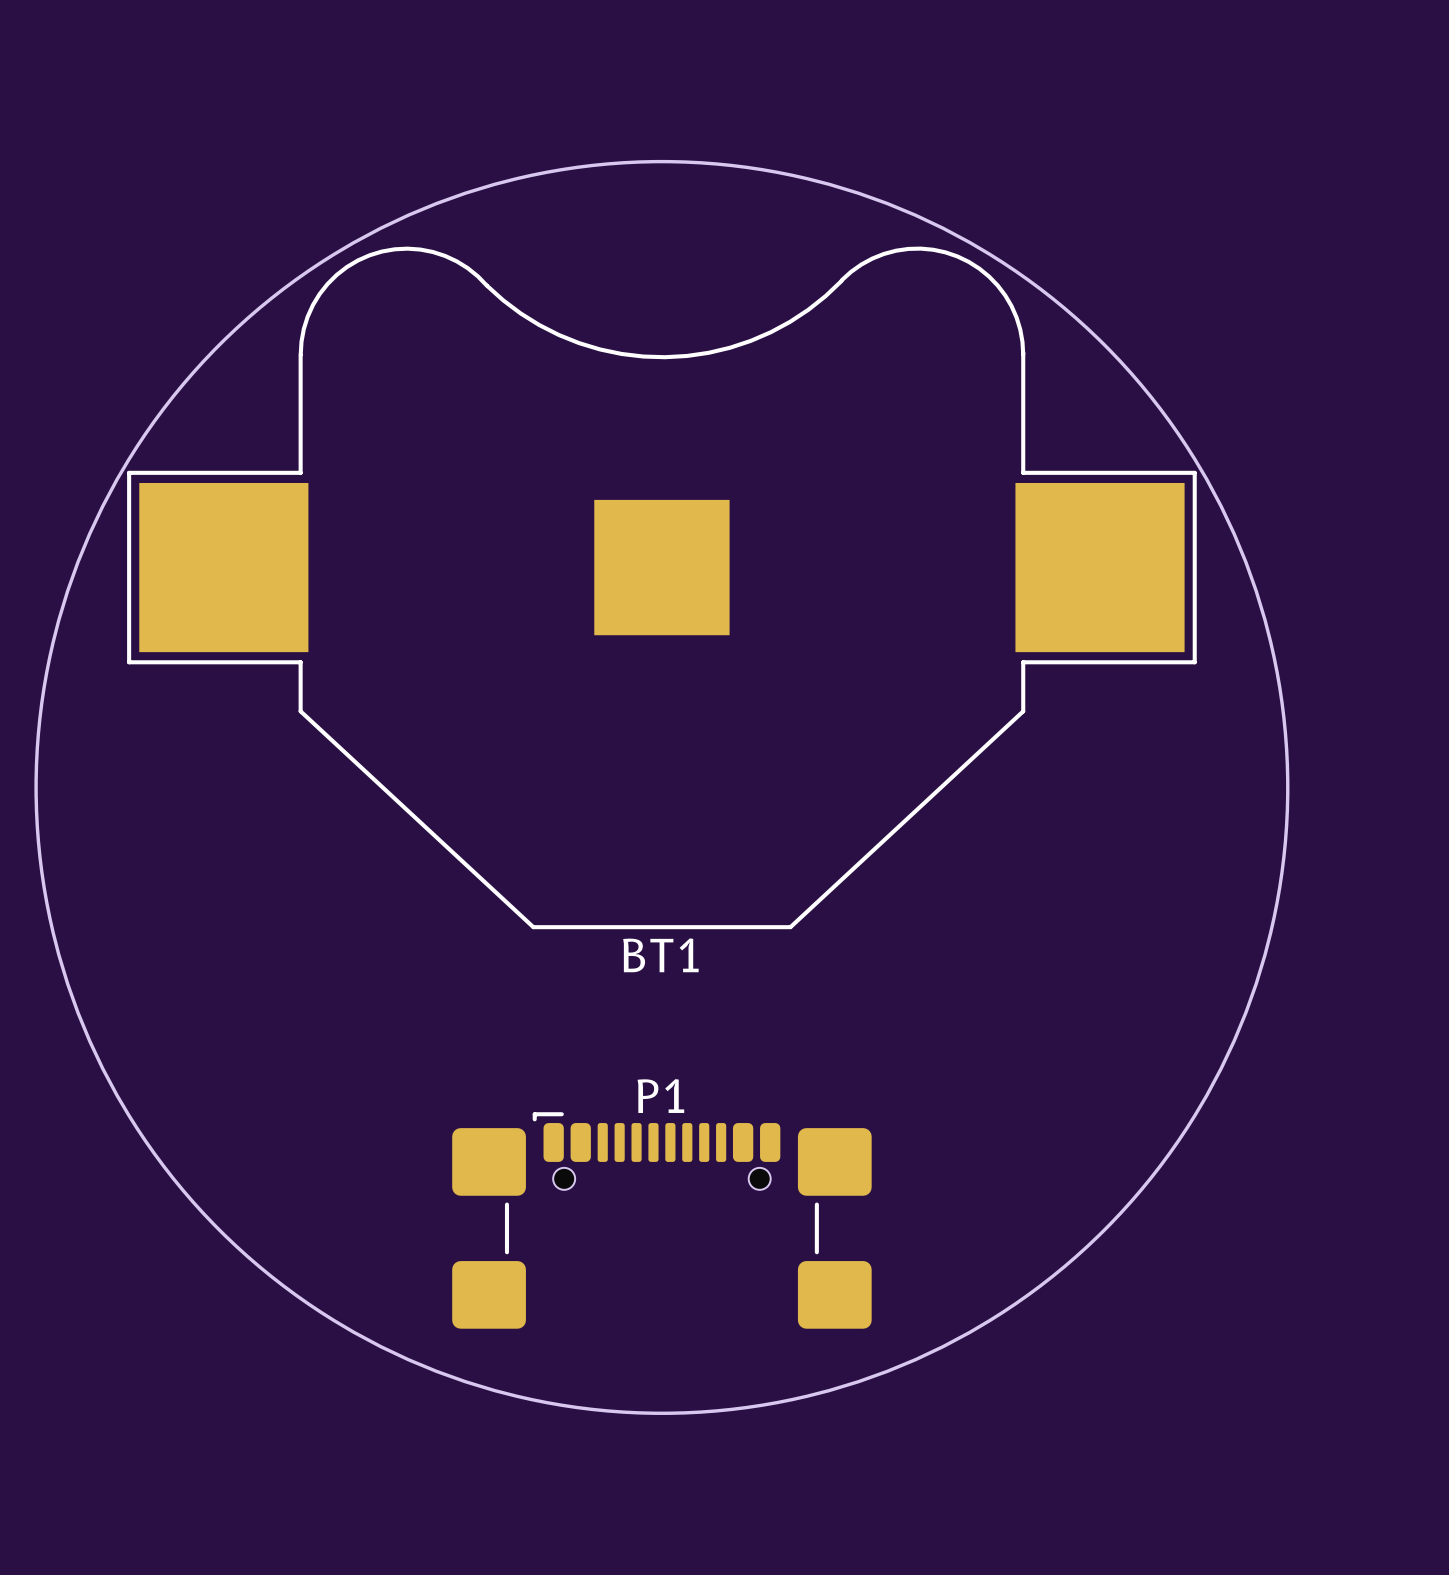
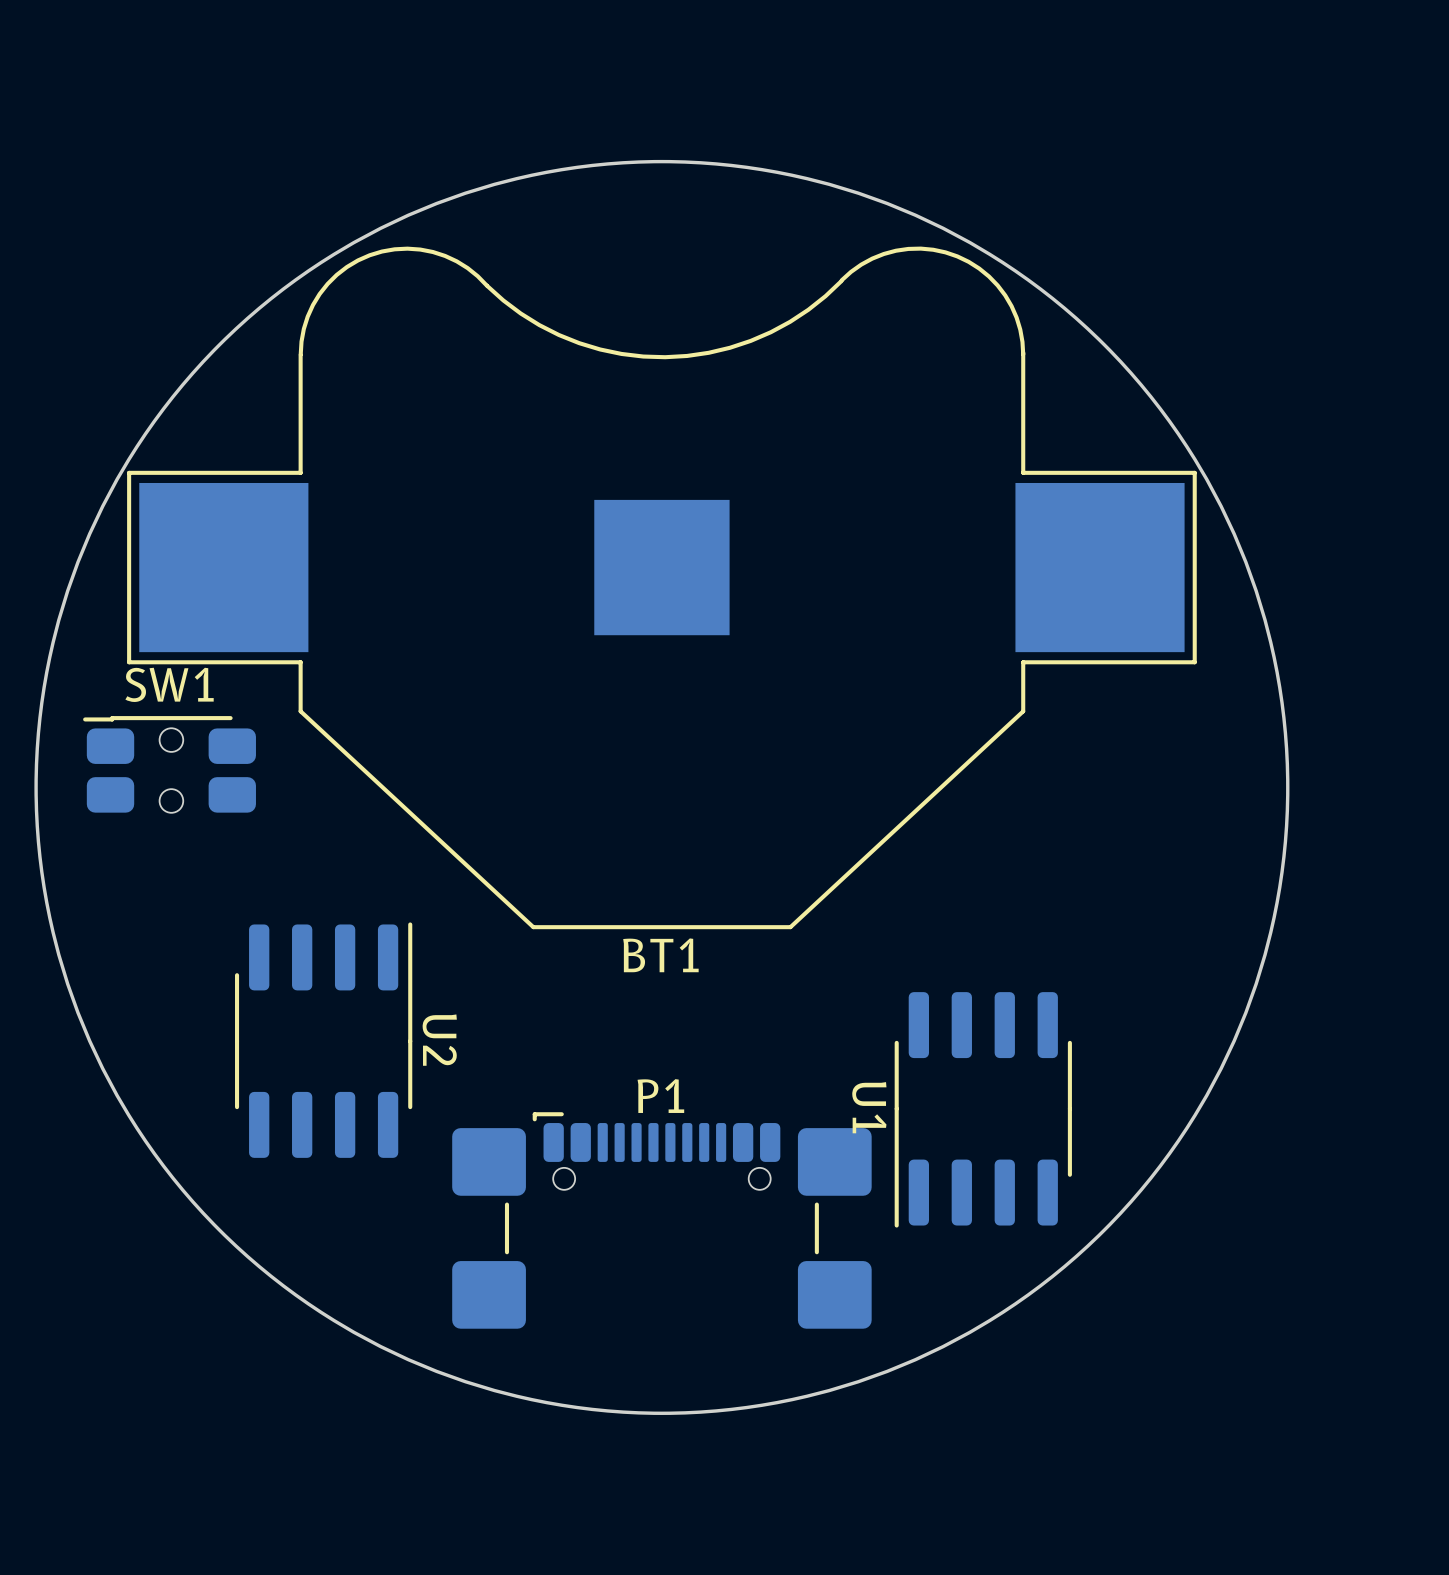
SW1: none -> (169, 764)
U2: none -> (323, 1040)
U1: none -> (983, 1109)

